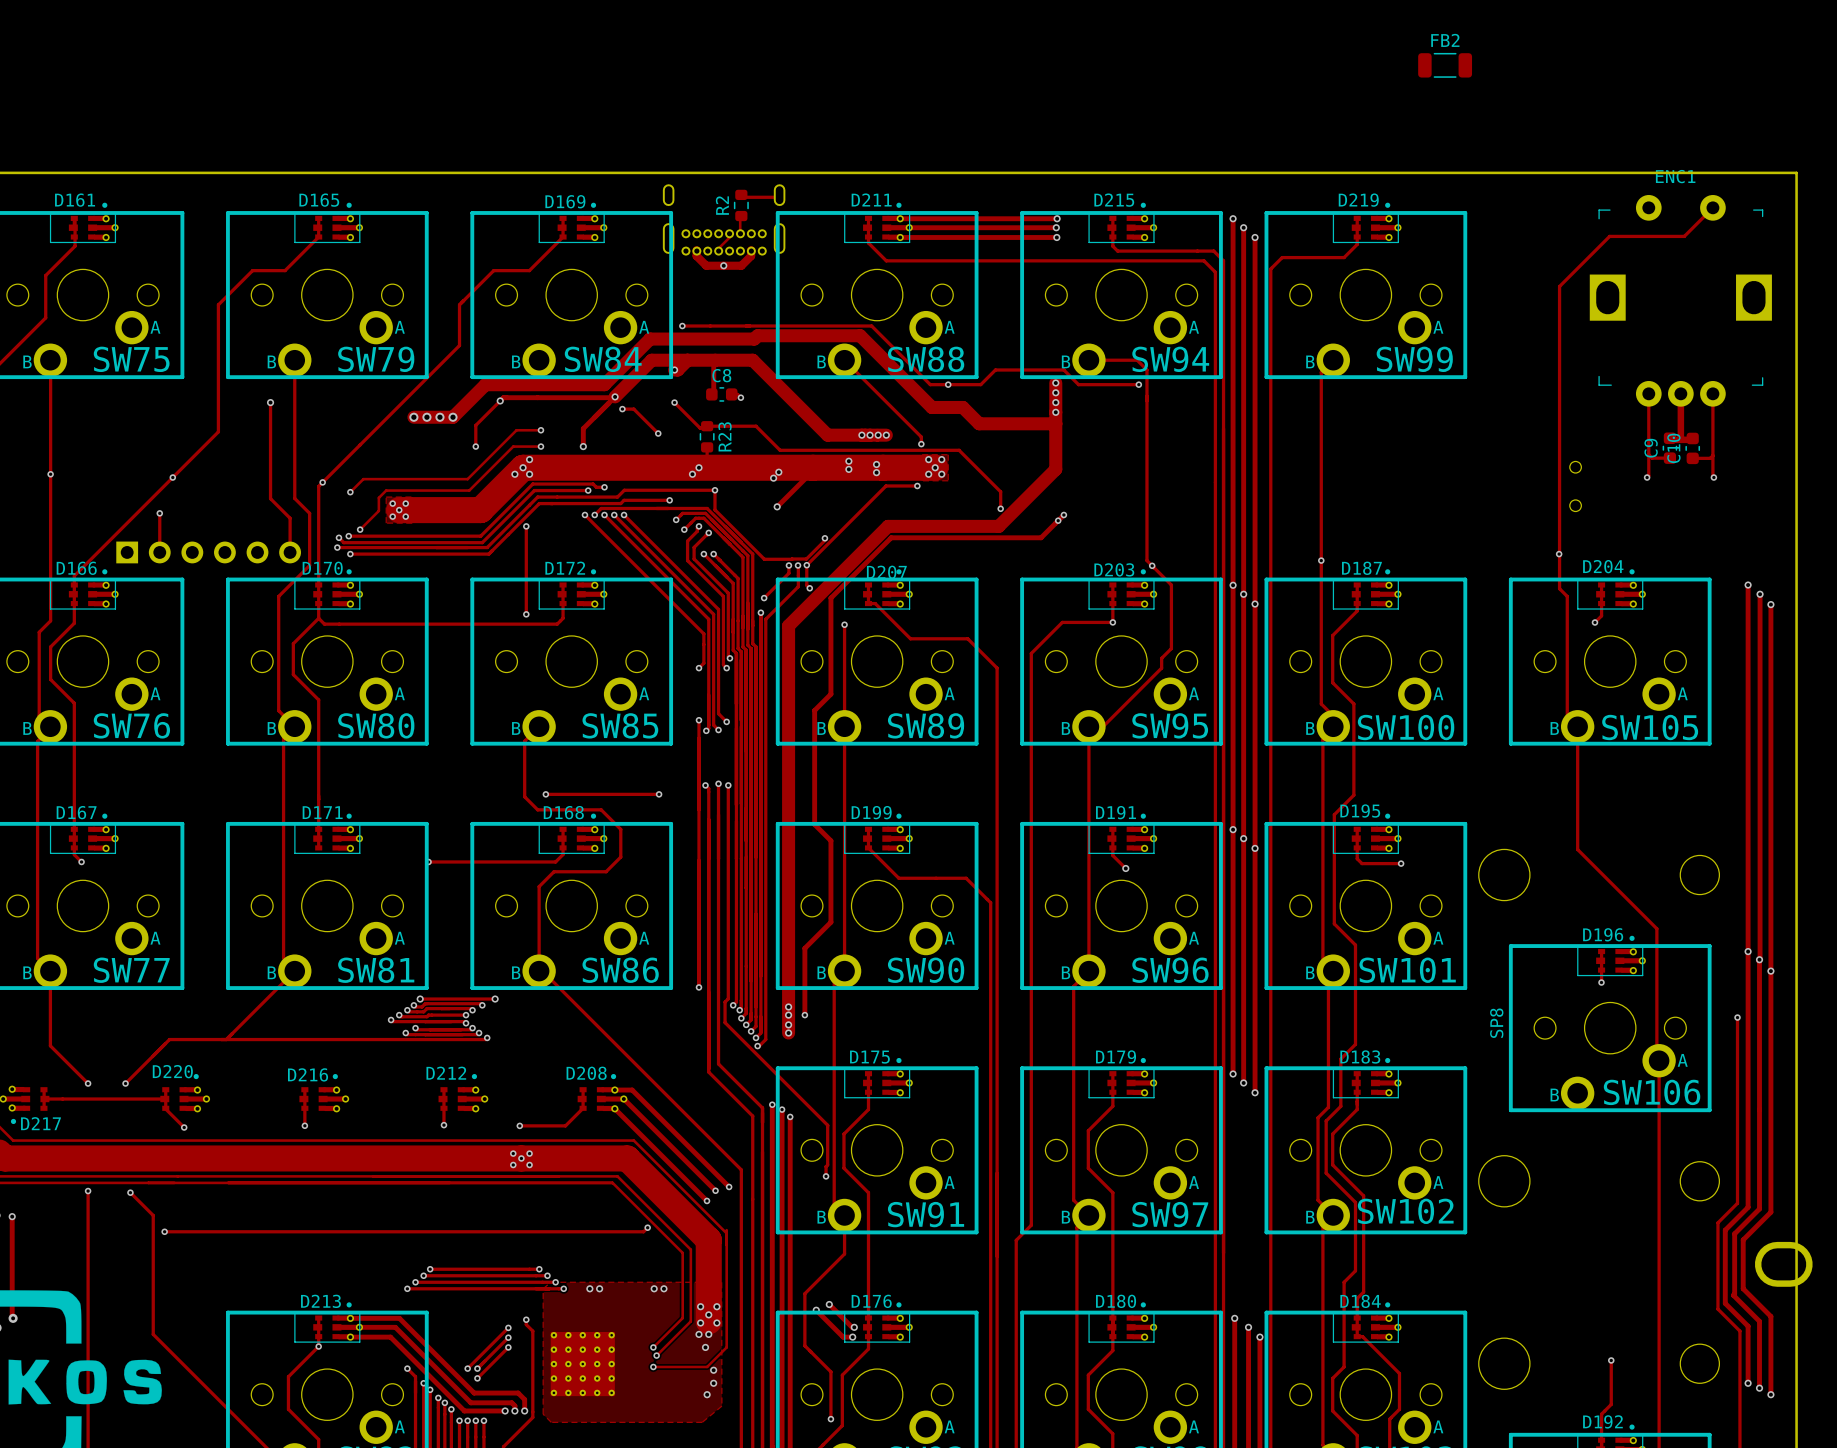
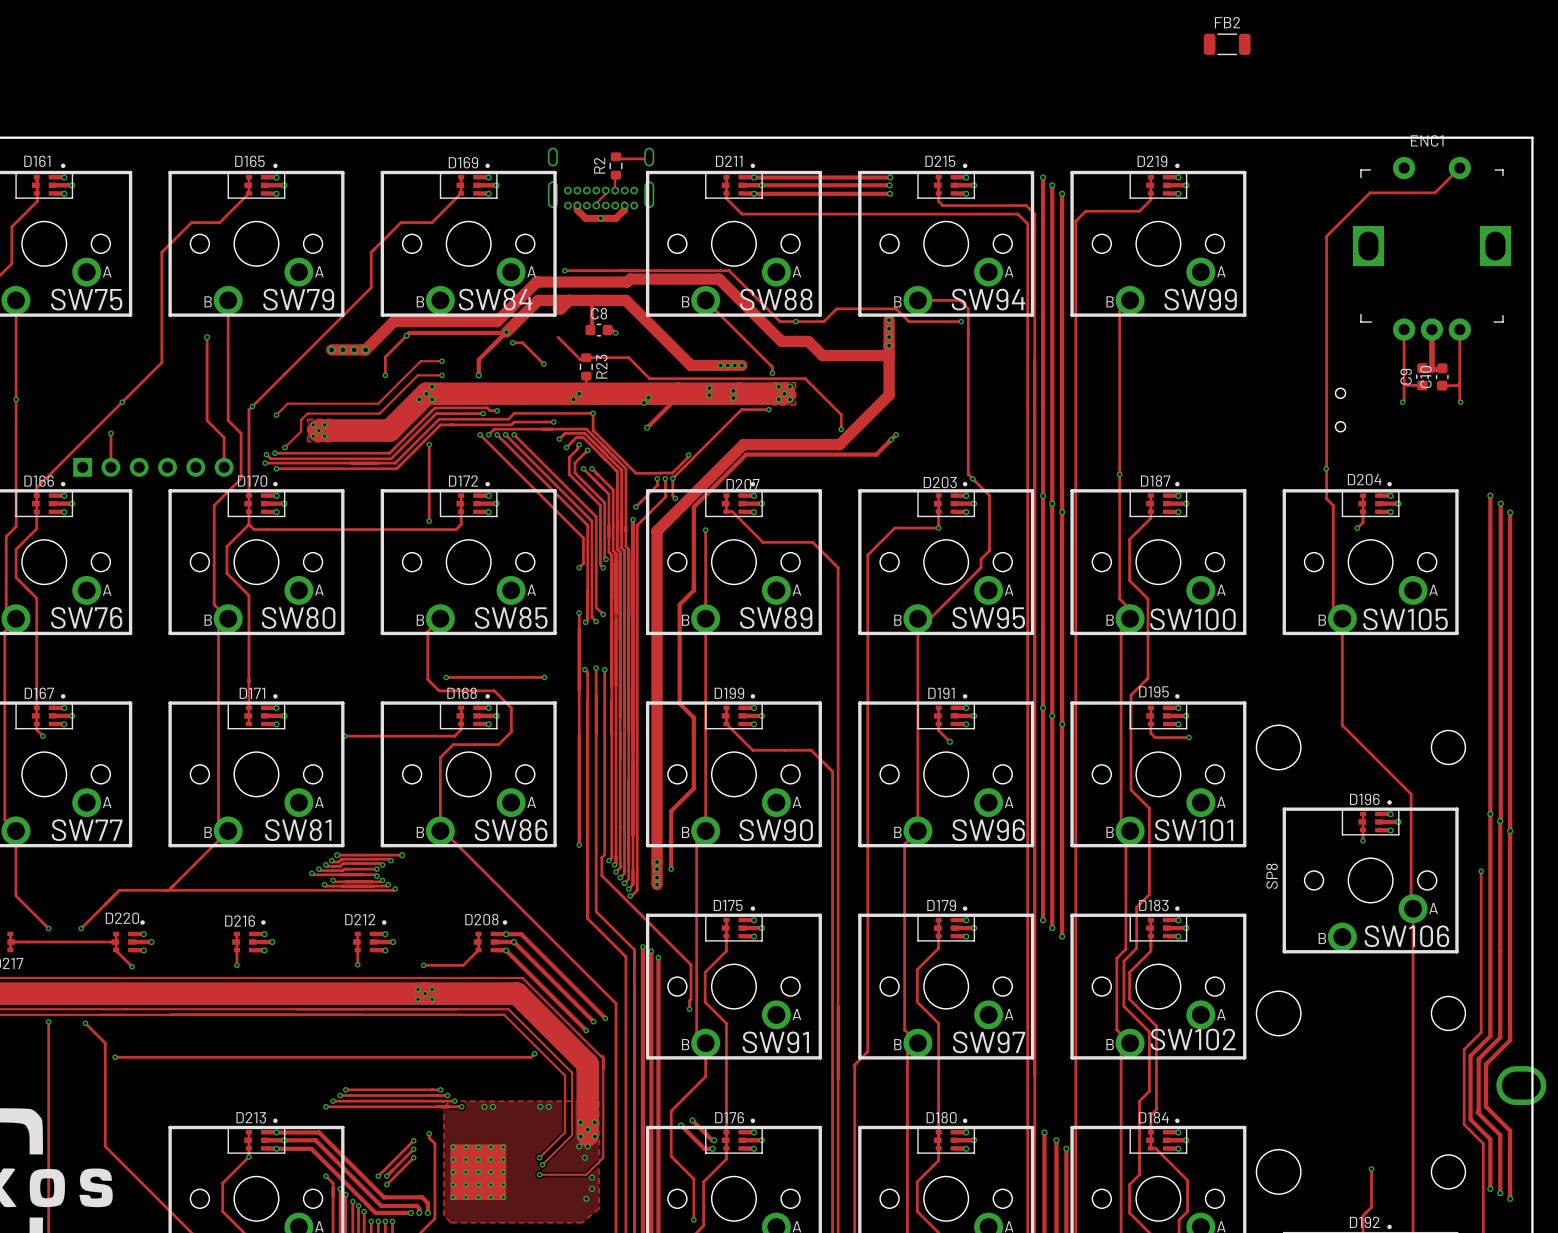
via: (674, 370) -> none
via: (674, 402) -> none

